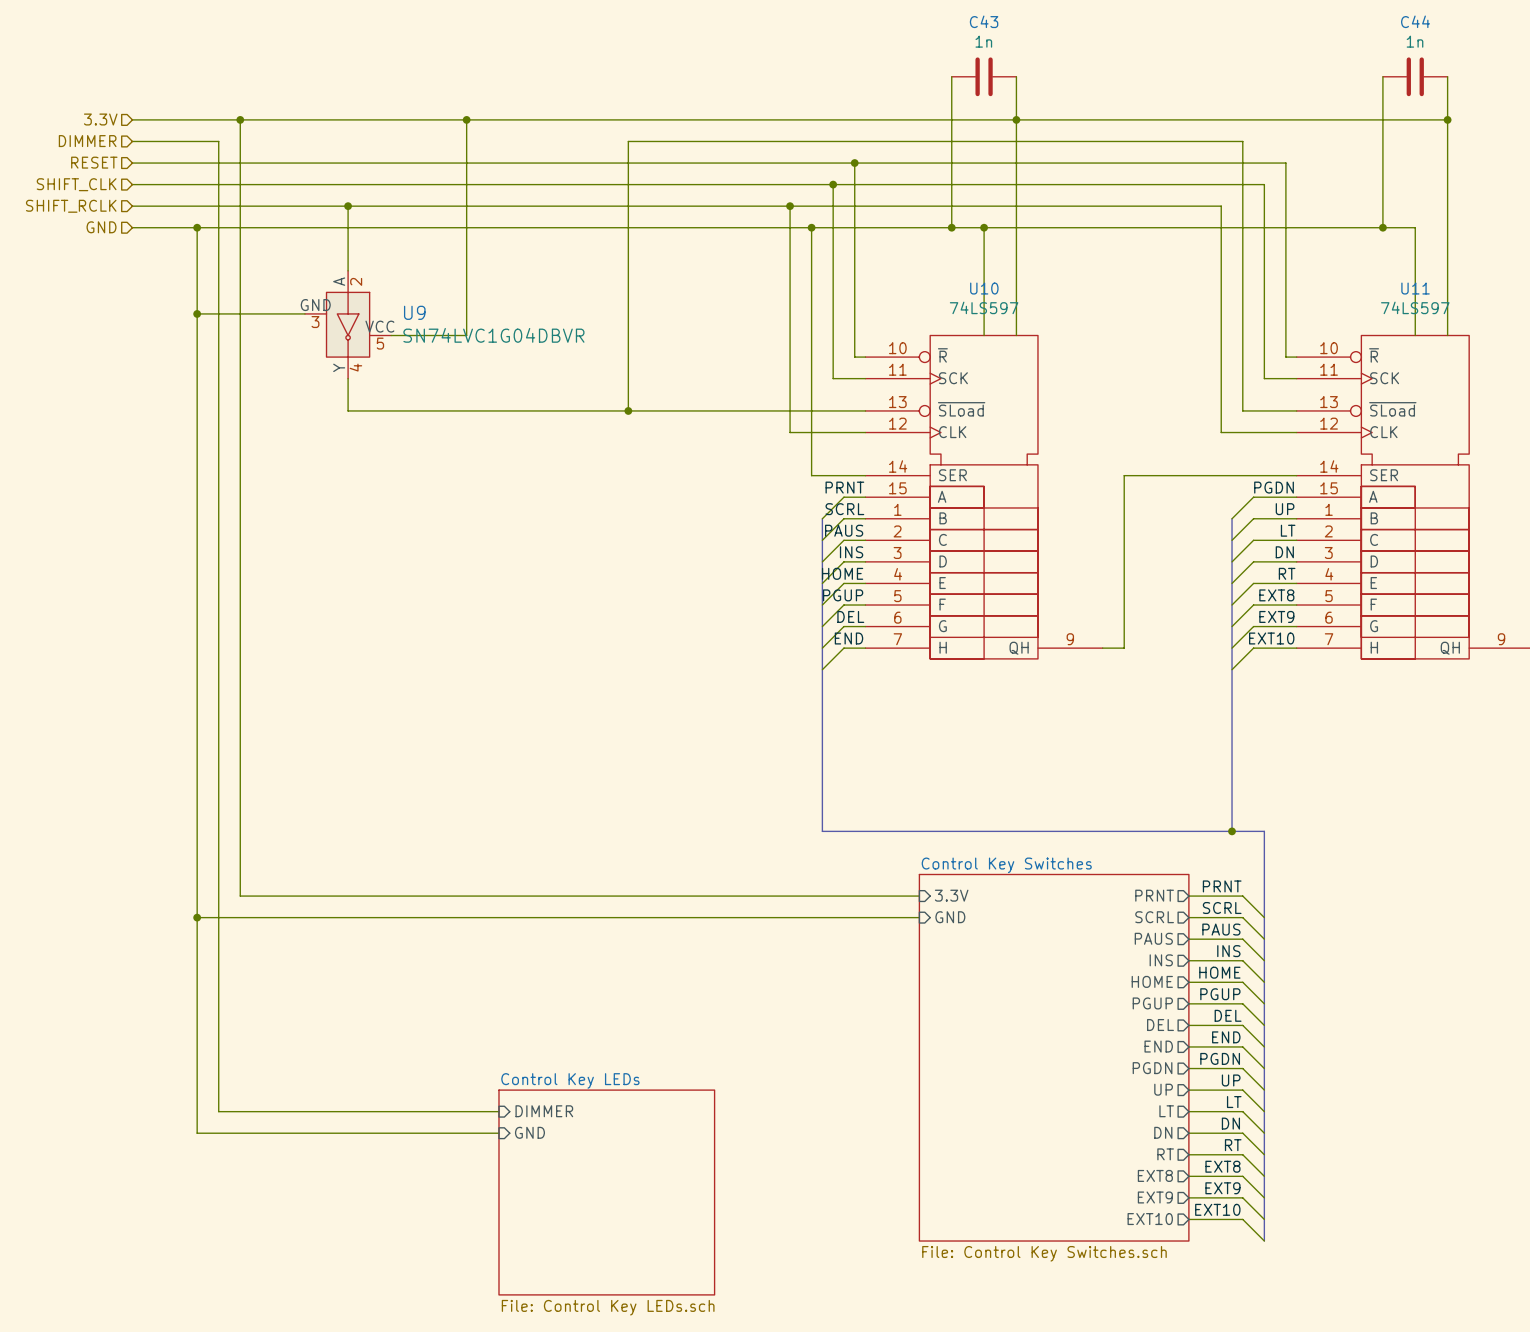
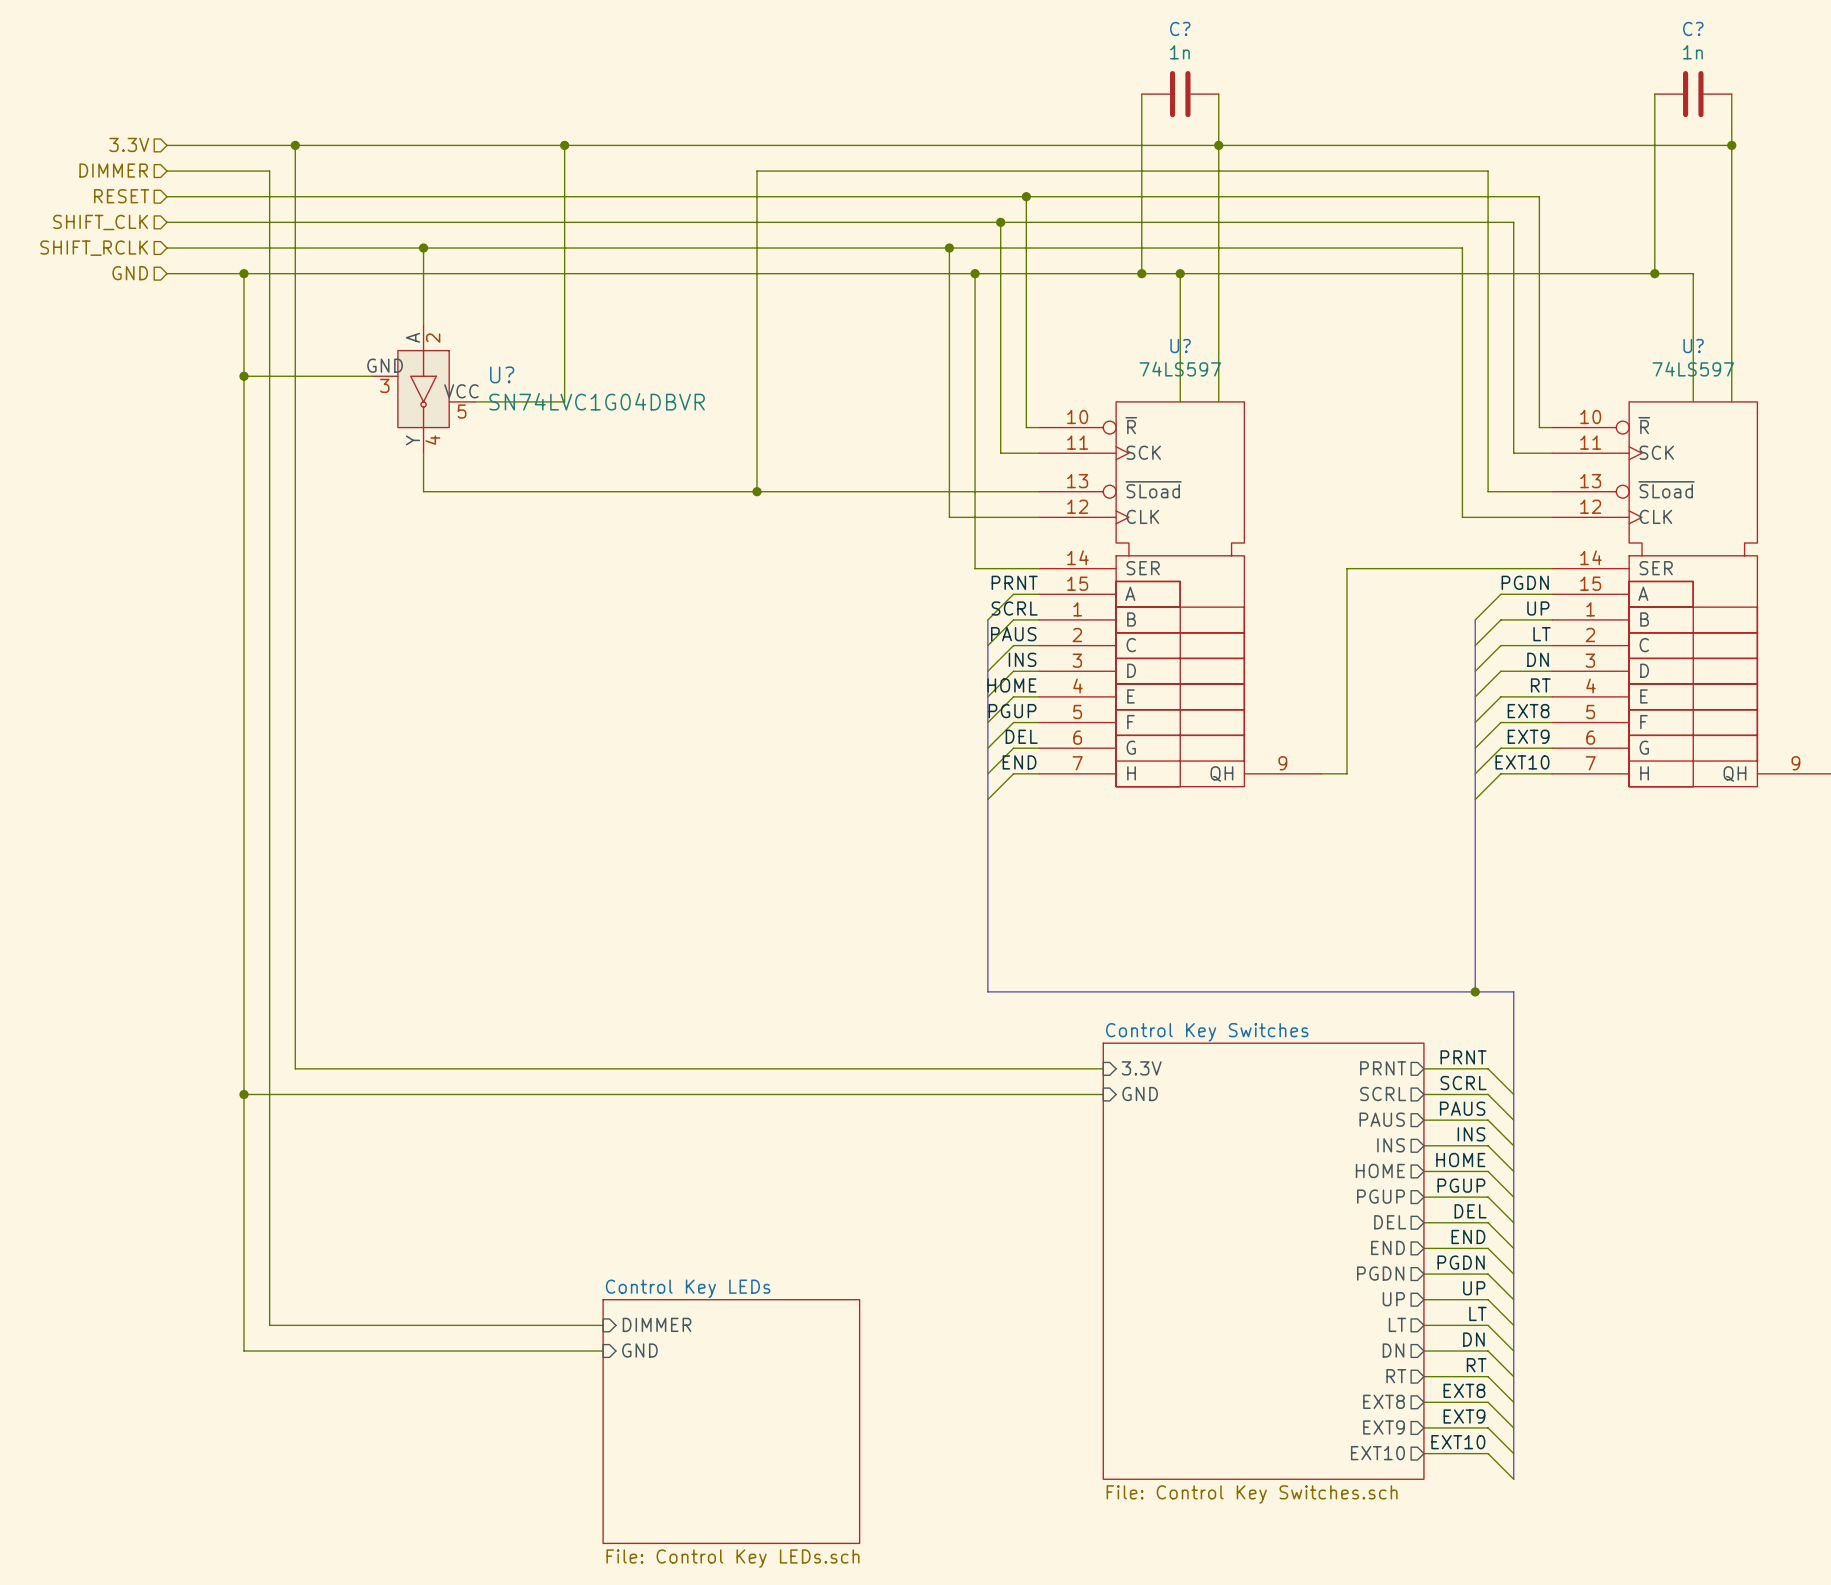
C43 name: C43 (984, 21) -> C? (1180, 28)
C44 name: C44 (1415, 21) -> C? (1693, 28)
U10 name: U10 (984, 288) -> U? (1180, 346)
U11 name: U11 (1415, 288) -> U? (1693, 346)
U9 name: U9 (414, 312) -> U? (502, 374)

